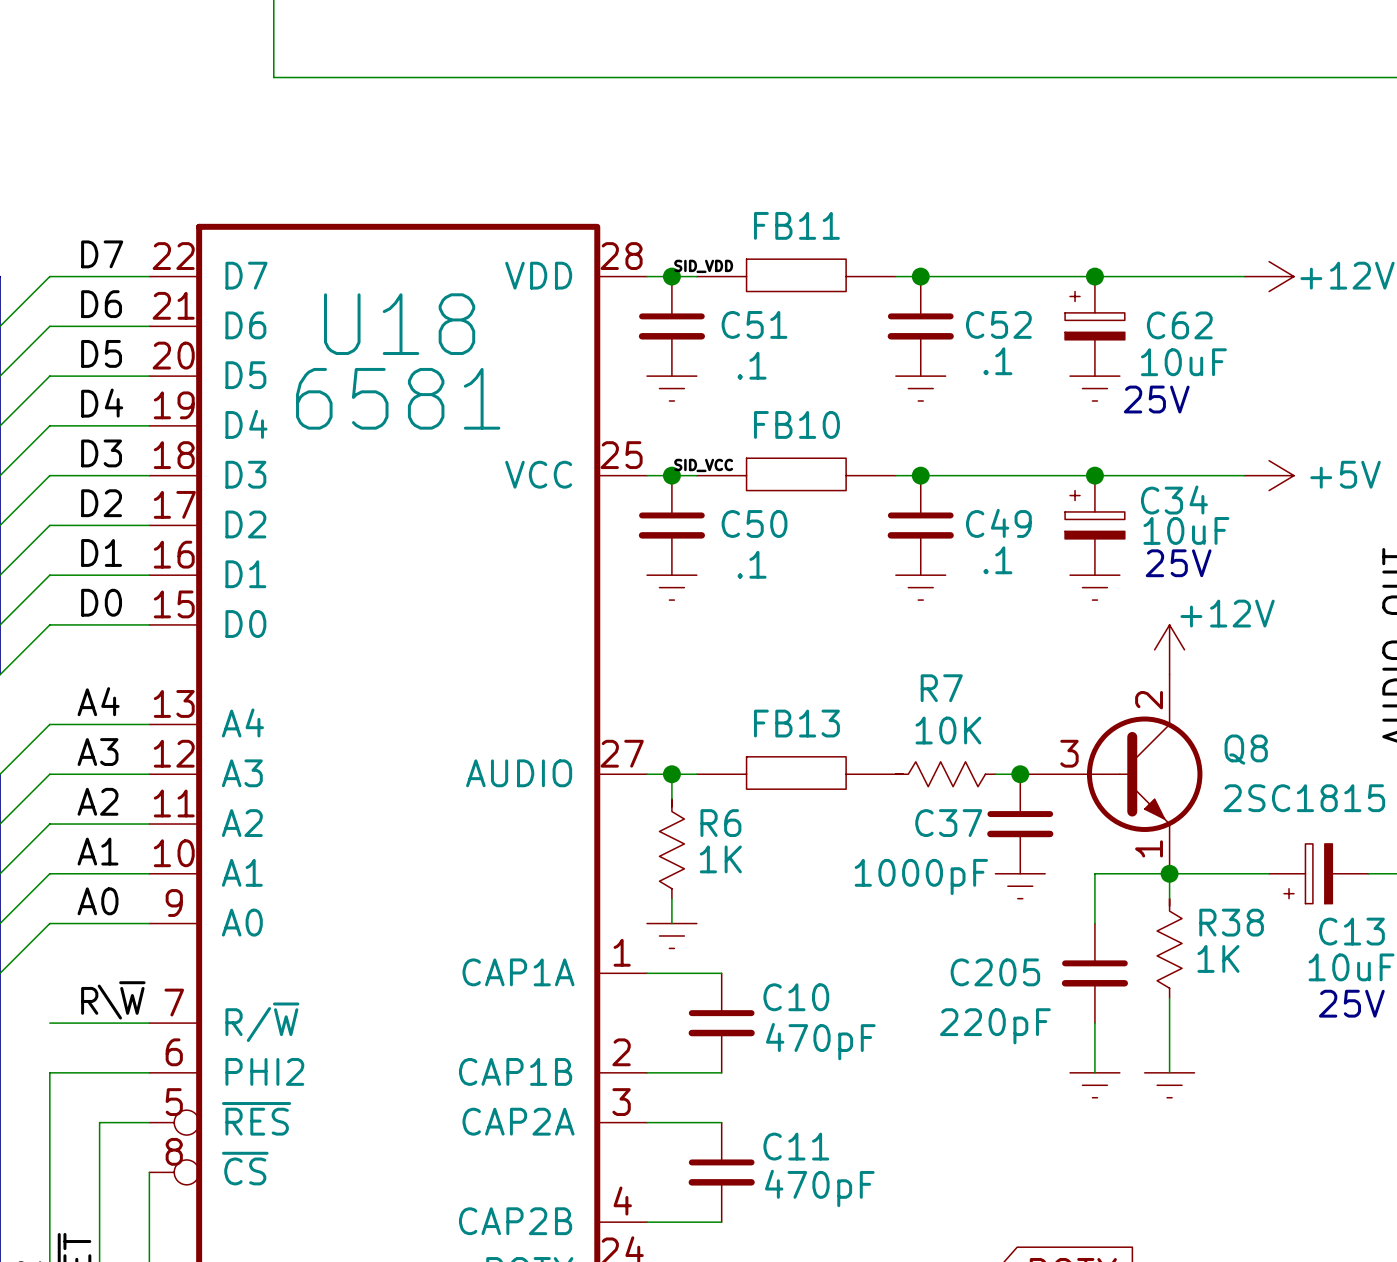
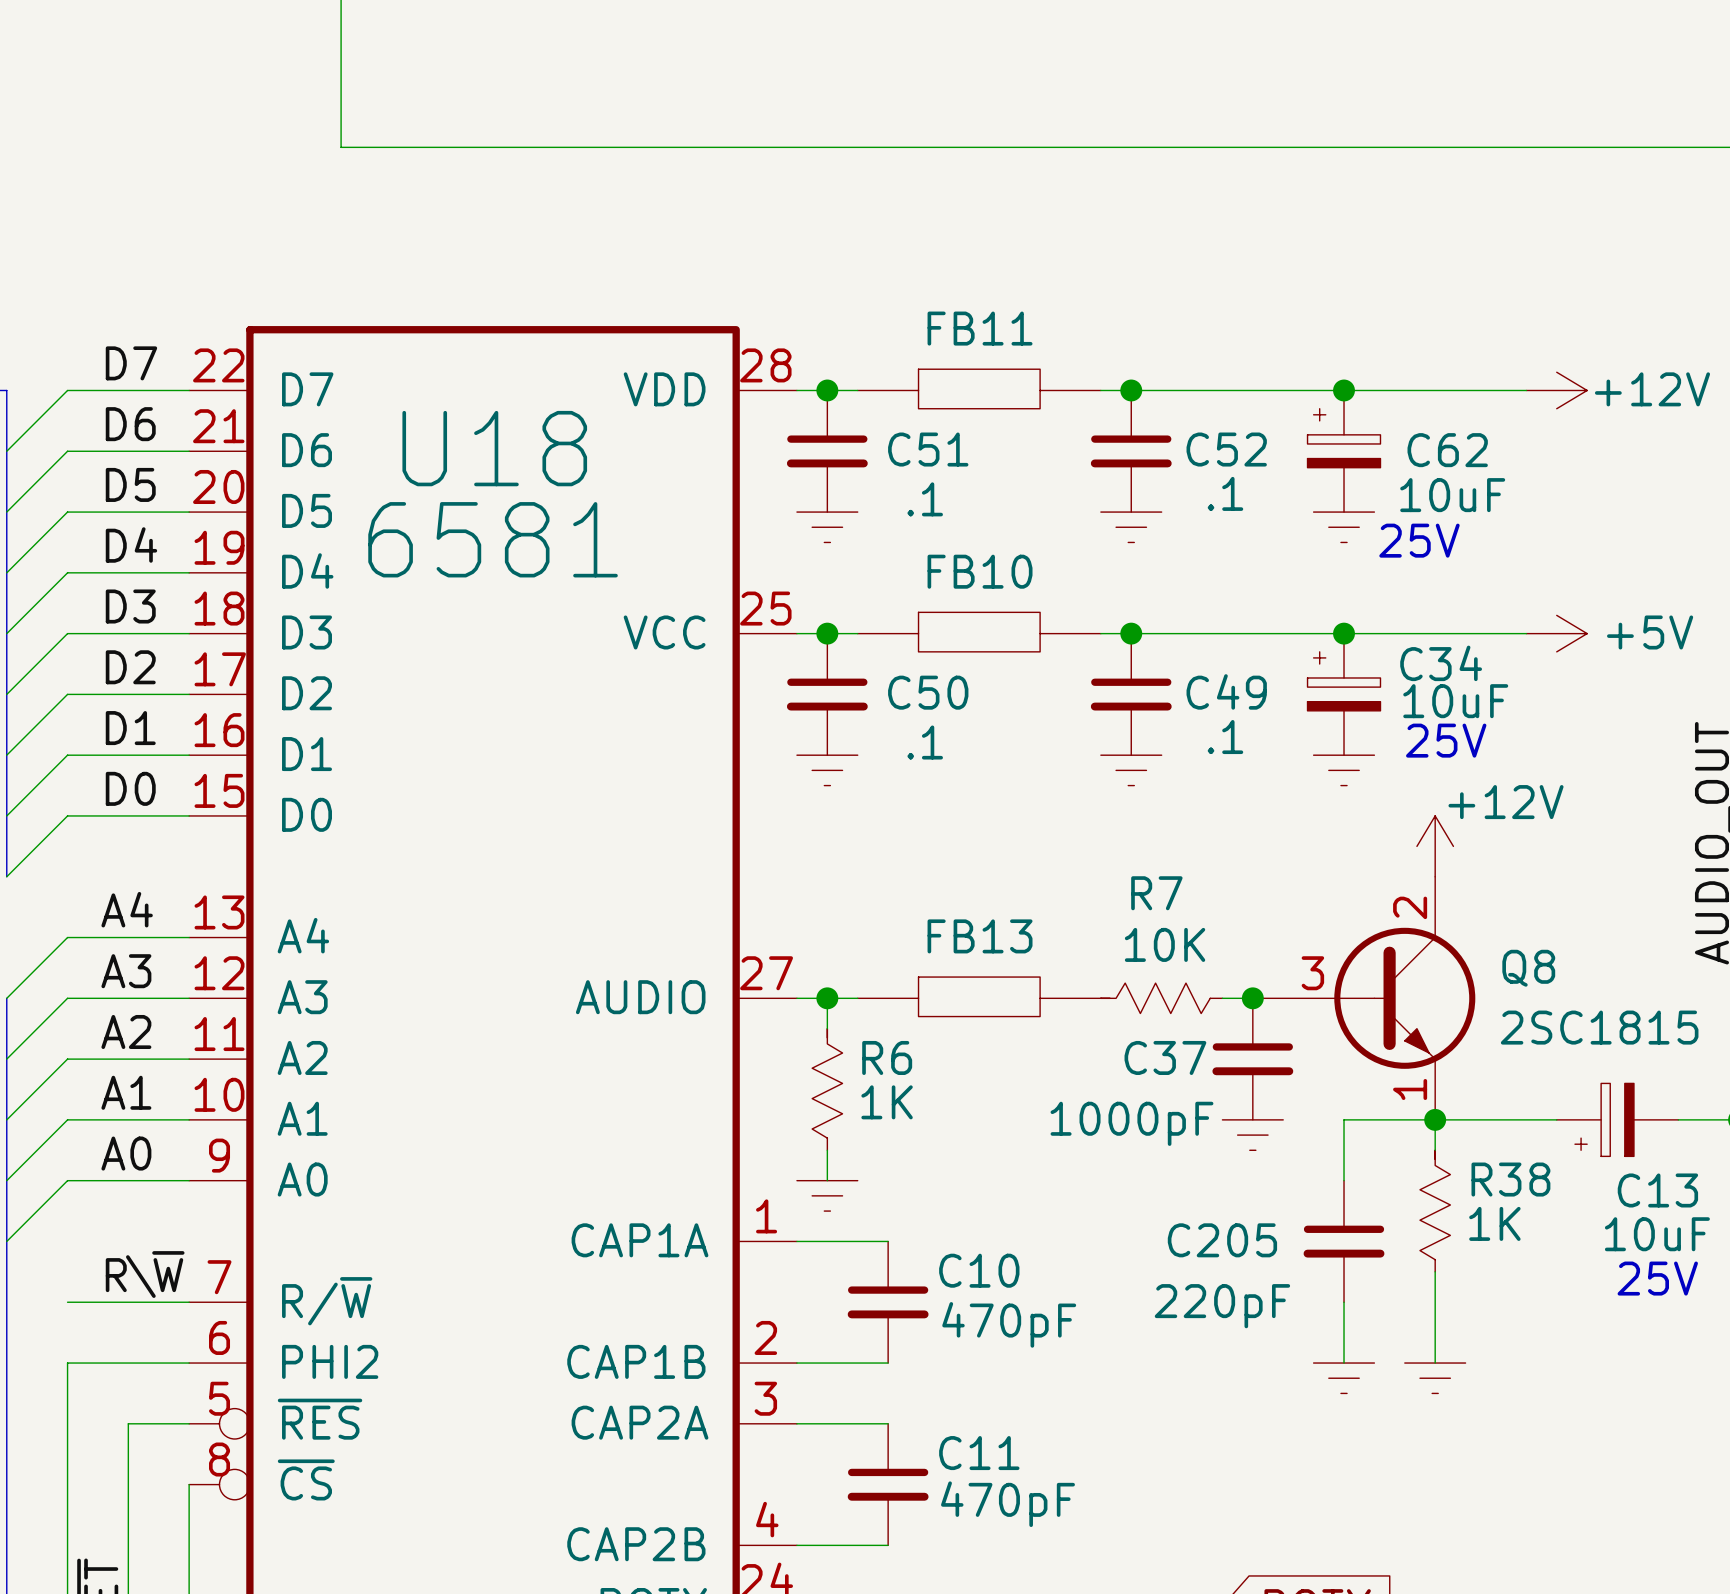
label: SID_VDD (703, 266) -> none
label: SID_VCC (703, 465) -> none

